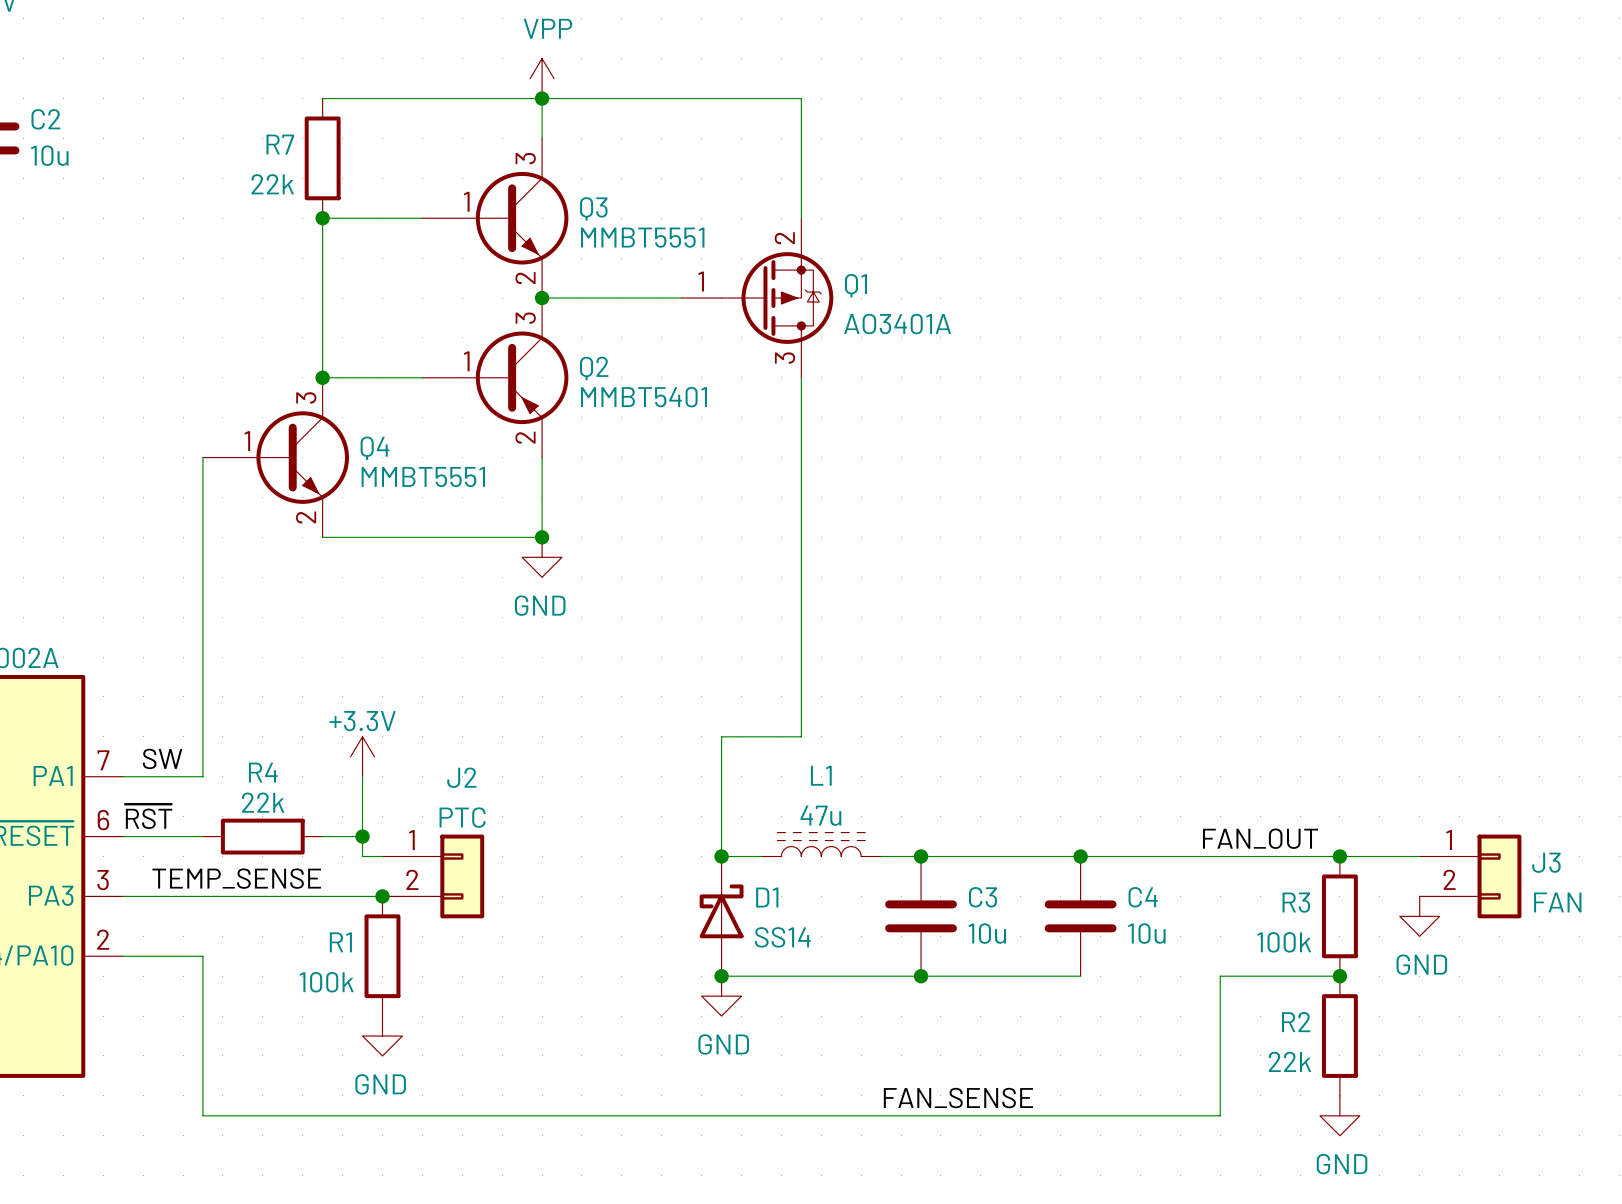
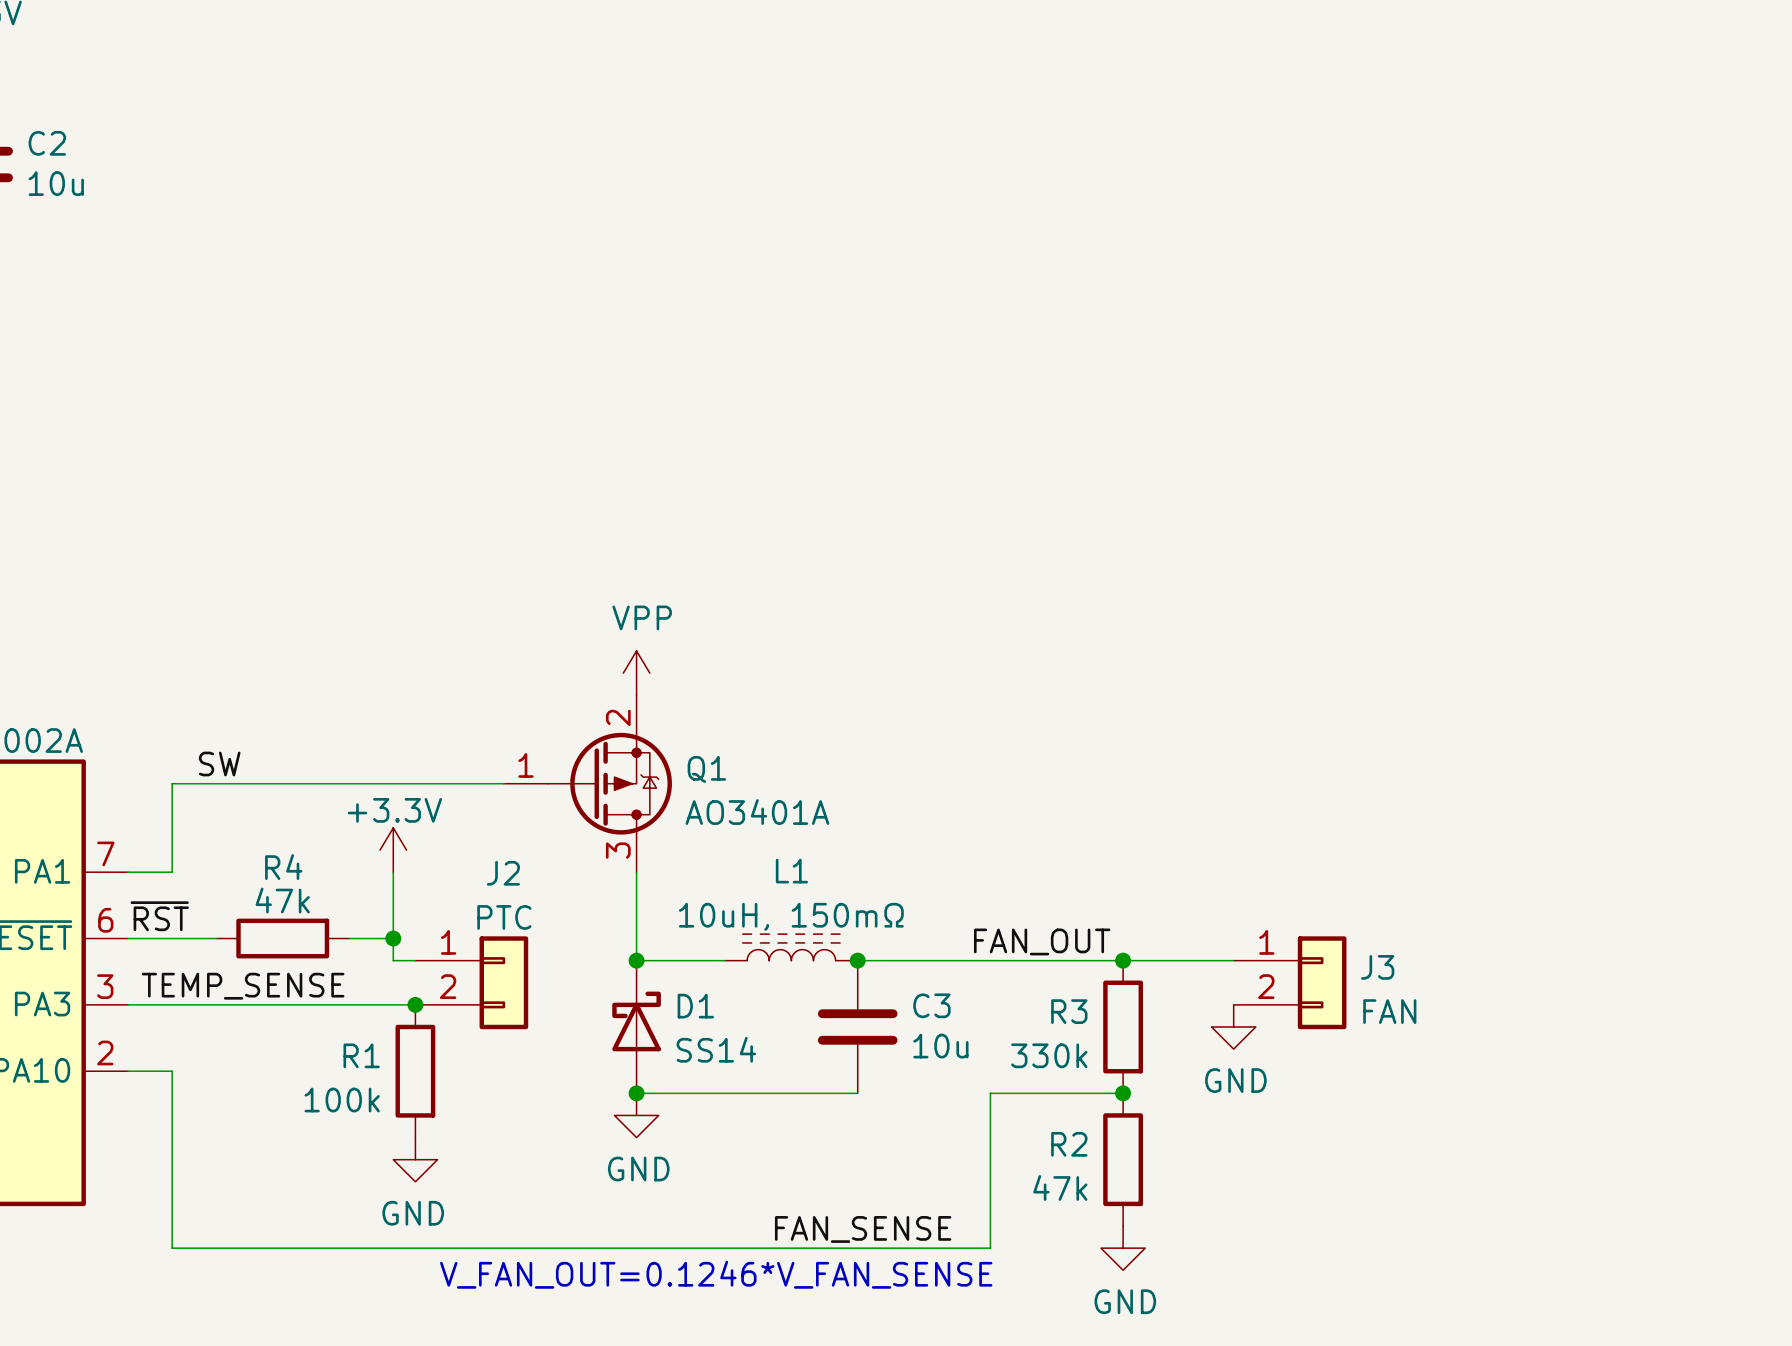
power symbol: VPP (542, 78) -> none
wire: (322, 98) (801, 98) (801, 218) -> none
wire: (542, 98) (542, 138) -> none
junction: (542, 98) -> none
R7: 22k (322, 158) -> none
junction: (322, 218) -> none
wire: (422, 218) (322, 218) (322, 377) (422, 377) -> none
Q3: MMBT5551 (495, 218) -> none
wire: (542, 298) (681, 298) -> none
junction: (542, 298) -> none
Q1 position: (757, 298) -> (587, 783)
junction: (322, 377) -> none
Q2: MMBT5401 (495, 377) -> none
wire: (801, 377) (801, 736) (721, 736) (721, 856) (761, 856) -> none
wire: (202, 457) (202, 776) (163, 776) -> (503, 783) (172, 783) (172, 872)
Q4: MMBT5551 (275, 457) -> none
wire: (542, 457) (542, 537) (322, 537) -> none
junction: (542, 537) -> none
power symbol: GND (542, 557) -> none
power symbol: none -> VPP (636, 673)
label position: SW (162, 758) -> SW (219, 763)
wire: none -> (636, 872) (636, 960) (725, 960)
R4 value: 22k (263, 802) -> 47k (282, 900)
L1 value: 47u (820, 815) -> 10uH, 150mΩ (791, 916)
label position: FAN_OUT (1260, 838) -> FAN_OUT (1042, 941)
L1 position: (821, 844) -> (791, 947)
junction: none -> (636, 960)
junction position: (721, 856) -> (857, 960)
wire: none -> (857, 960) (968, 960)
junction: (921, 856) -> none
junction: none -> (1123, 960)
junction: (1080, 856) -> none
wire: (1120, 856) (1419, 856) -> none
junction: (1339, 856) -> none
J3 position: (1470, 876) -> (1290, 982)
D1 position: (721, 916) -> (636, 1026)
C3 position: (921, 916) -> (857, 1026)
C4: 10u (1080, 916) -> none
power symbol: none -> GND (1233, 1026)
R3 position: (1339, 916) -> (1123, 1026)
power symbol: GND (1419, 916) -> none
R3 value: 100k (1284, 942) -> 330k (1049, 1055)
wire: (163, 956) (202, 956) (202, 1115) -> (172, 1071) (172, 1248) (216, 1248)
wire: none -> (636, 1093) (791, 1093)
junction: none -> (636, 1093)
junction: (721, 976) -> none
wire: (781, 976) (901, 976) -> (990, 1248) (990, 1093)
junction: (921, 976) -> none
wire: (1020, 976) (1080, 976) -> none
junction: none -> (1123, 1093)
wire: (1339, 976) (1220, 976) (1220, 1115) (901, 1115) -> none
junction: (1339, 976) -> none
power symbol position: GND (721, 996) -> GND (636, 1115)
R2 position: (1339, 1036) -> (1123, 1159)
R2 value: 22k (1289, 1061) -> 47k (1060, 1187)
label position: FAN_SENSE (958, 1098) -> FAN_SENSE (863, 1229)
power symbol: none -> GND (1123, 1248)
power symbol: GND (1339, 1115) -> none
text: none -> V_FAN_OUT=0.1246*V_FAN_SENSE (716, 1274)

